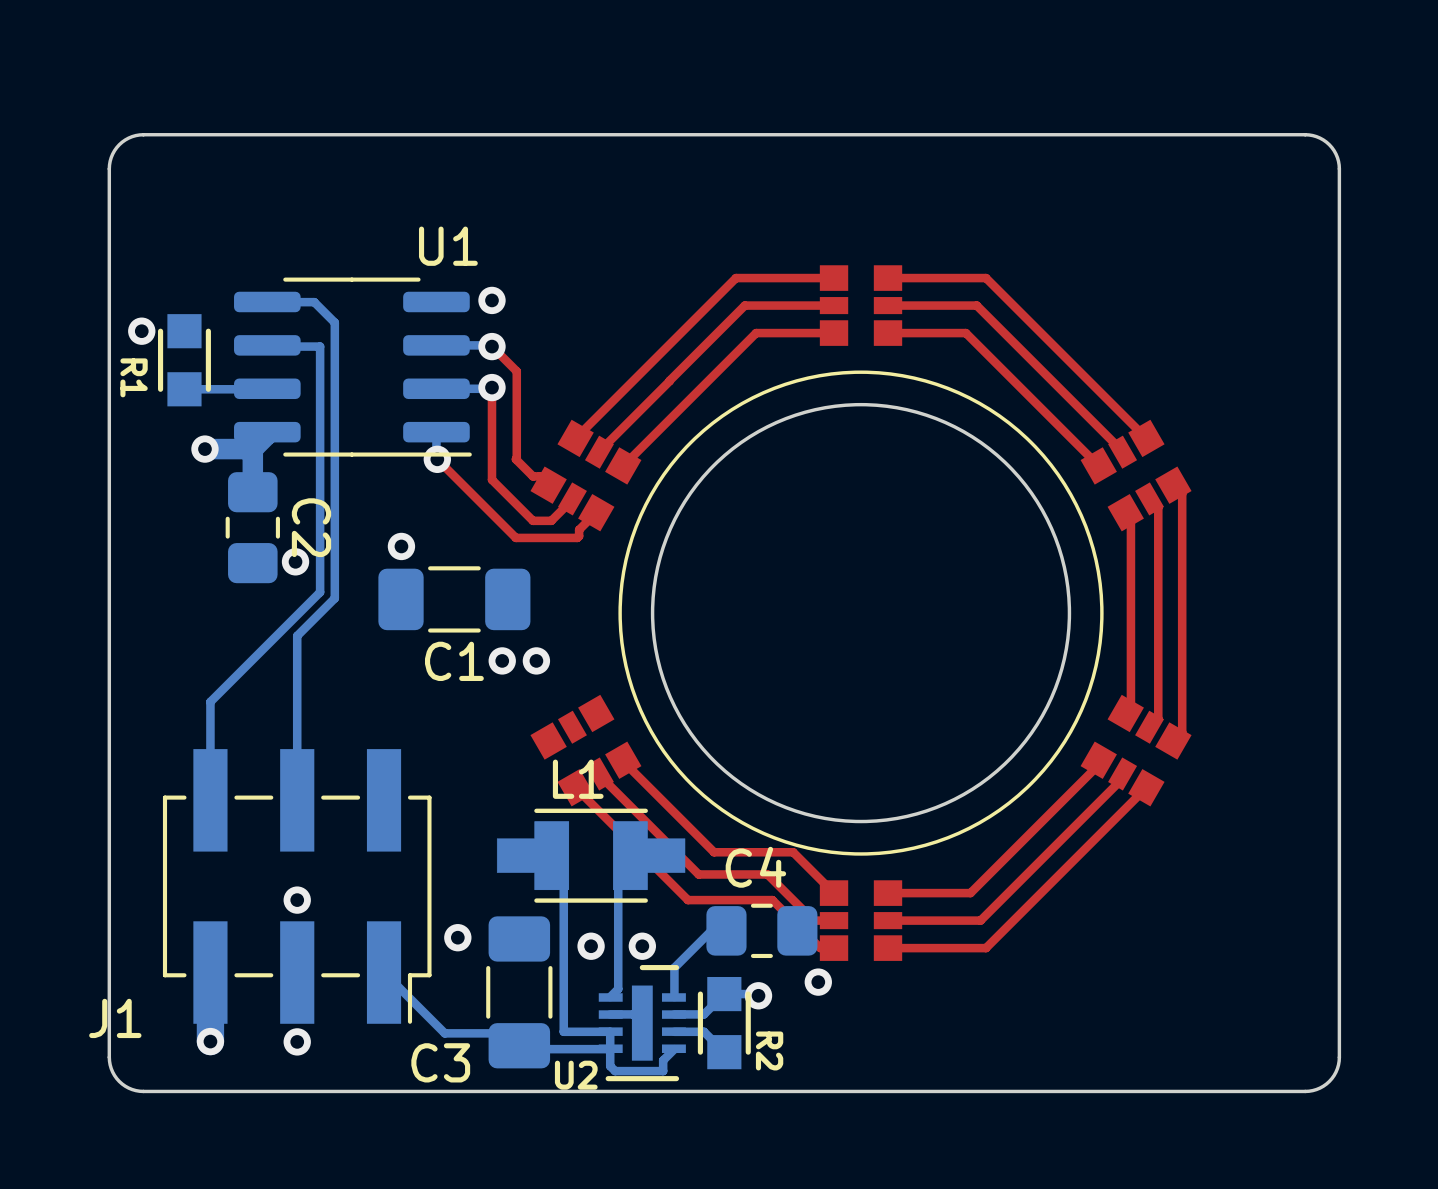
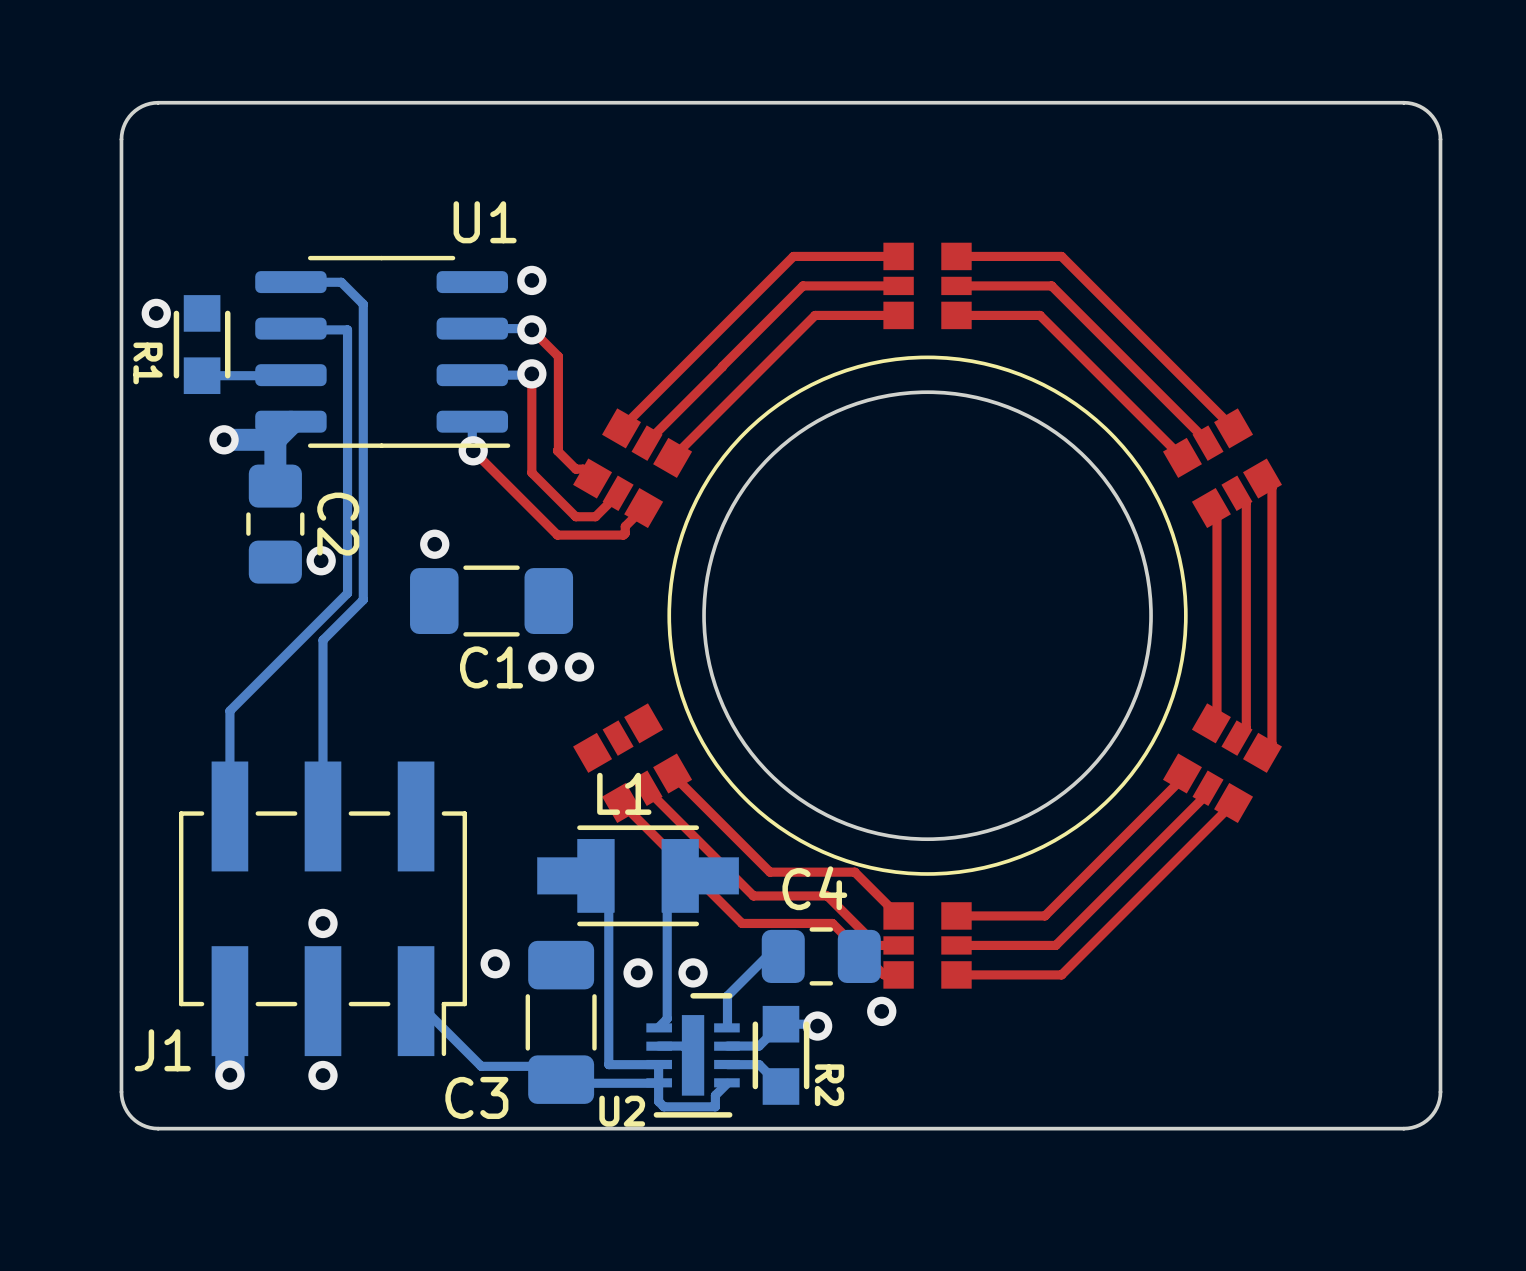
J1 name position: J1 (115, 1018) -> J1 (162, 1050)

